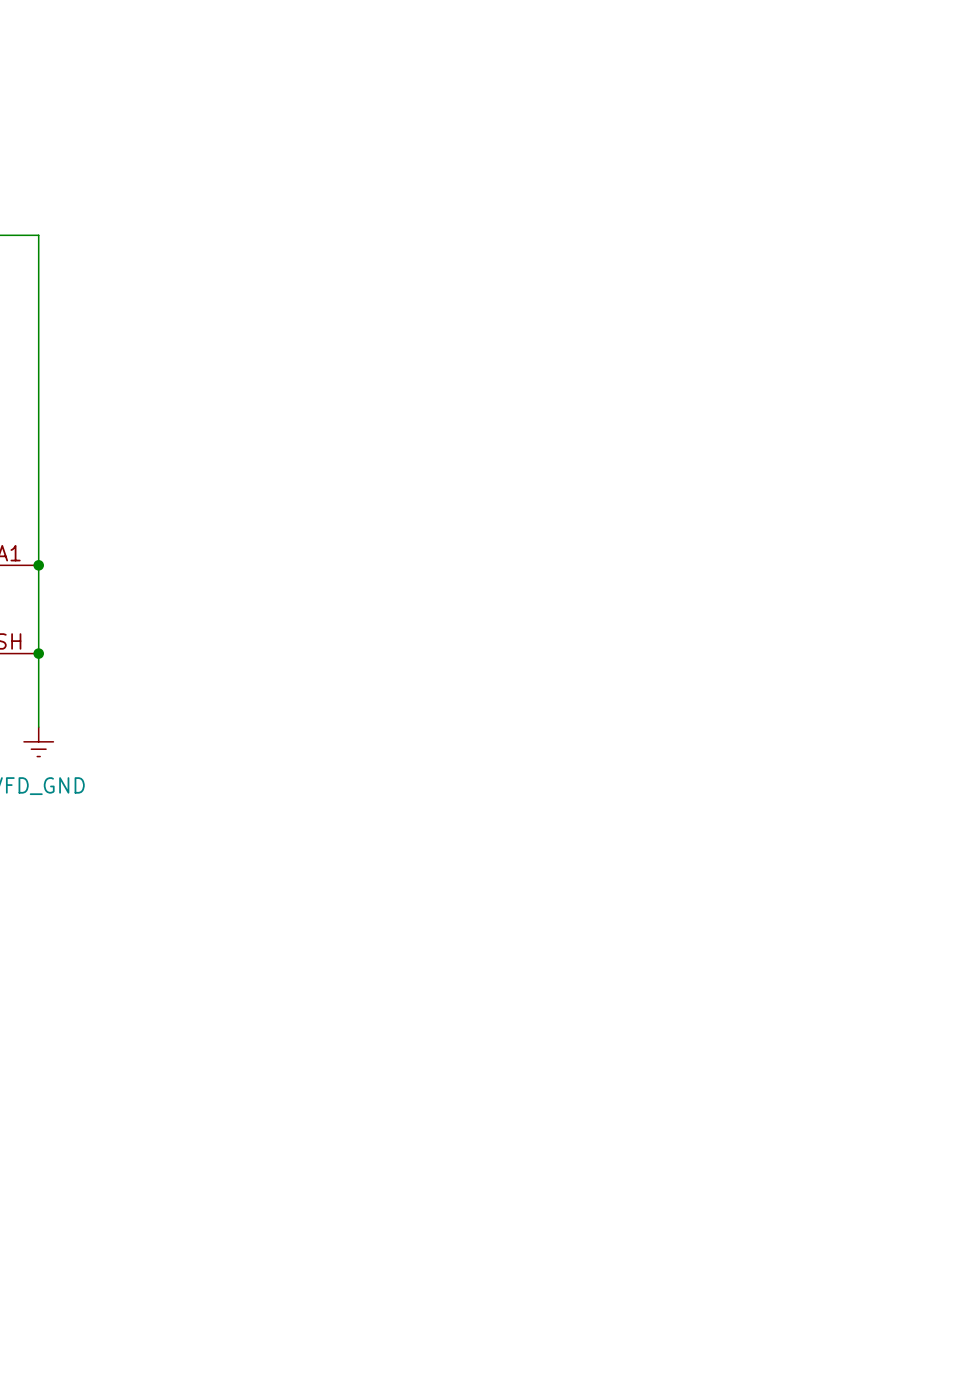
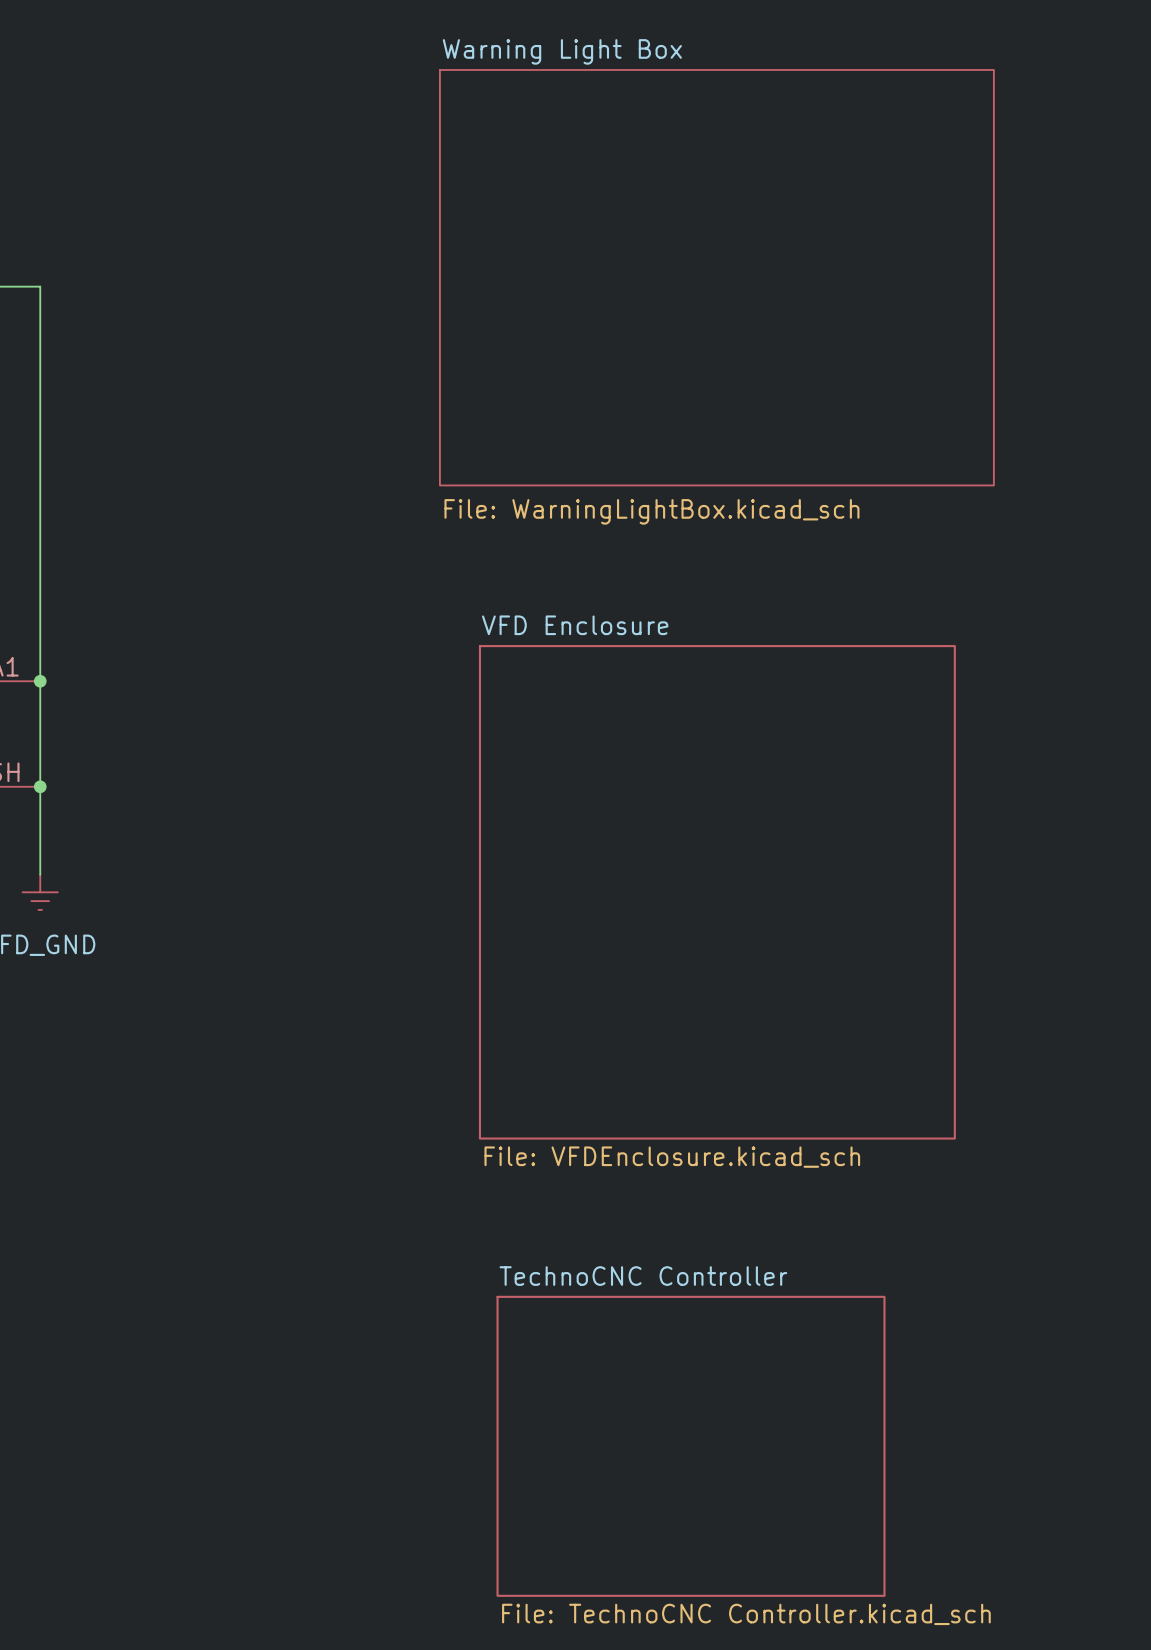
sheet Warning Light Box: none -> File: WarningLightBox.kicad_sch (716, 277)
sheet VFD Enclosure: none -> File: VFDEnclosure.kicad_sch (717, 892)
sheet TechnoCNC Controller: none -> File: TechnoCNC Controller.kicad_sch (691, 1446)

